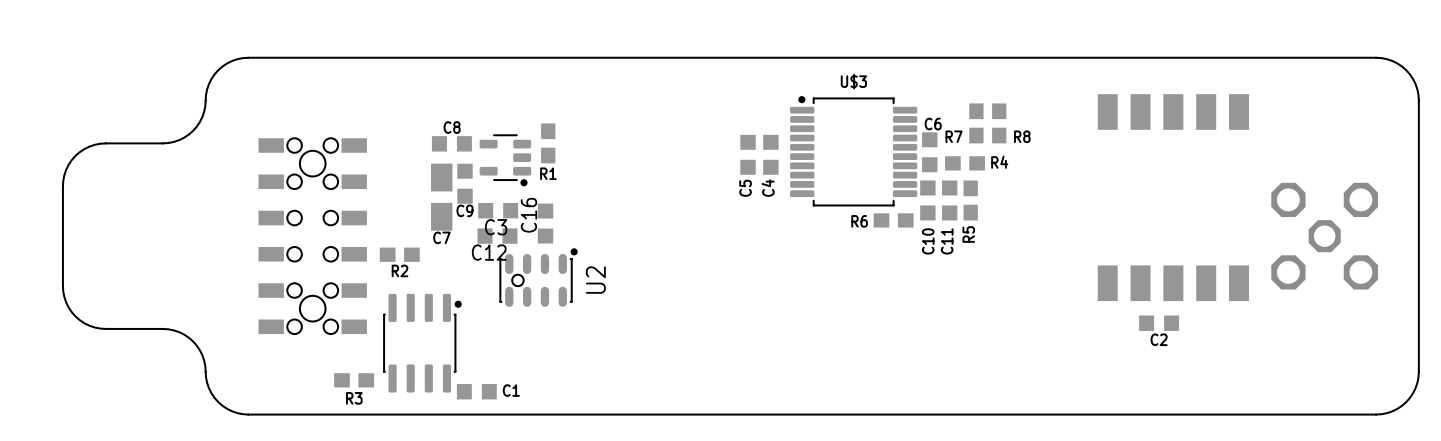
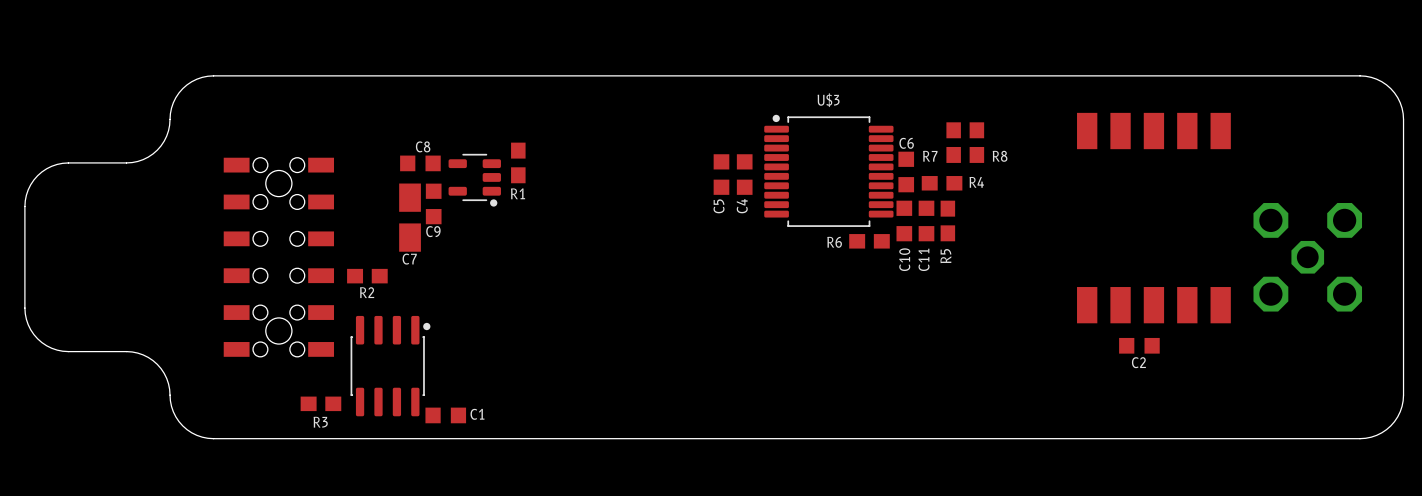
C3: (498, 210) -> none
C16: (545, 223) -> none
C12: (497, 236) -> none
U2: (538, 277) -> none

